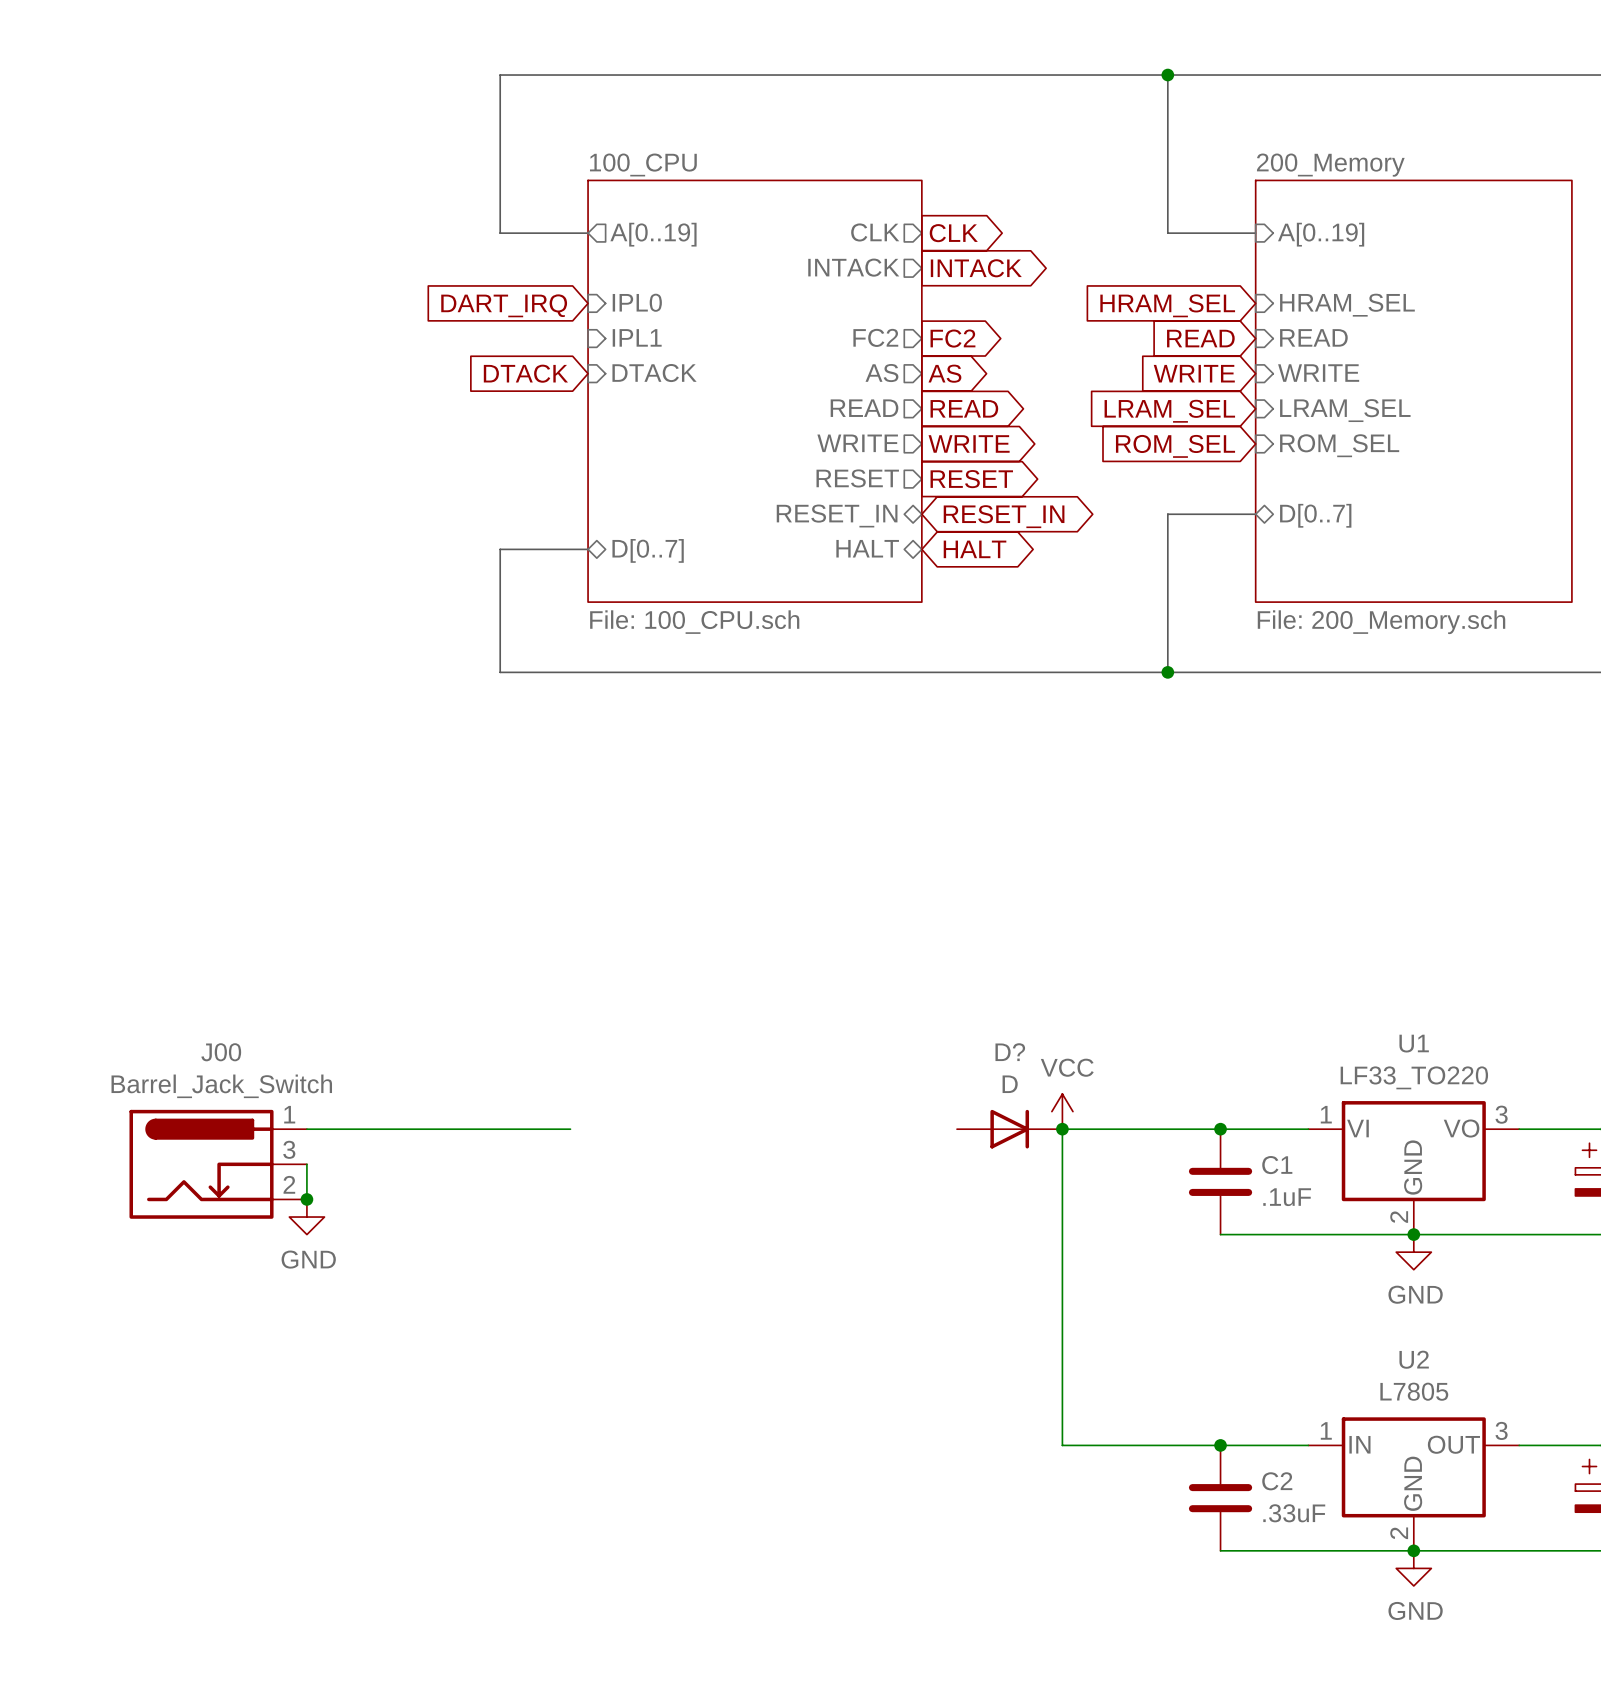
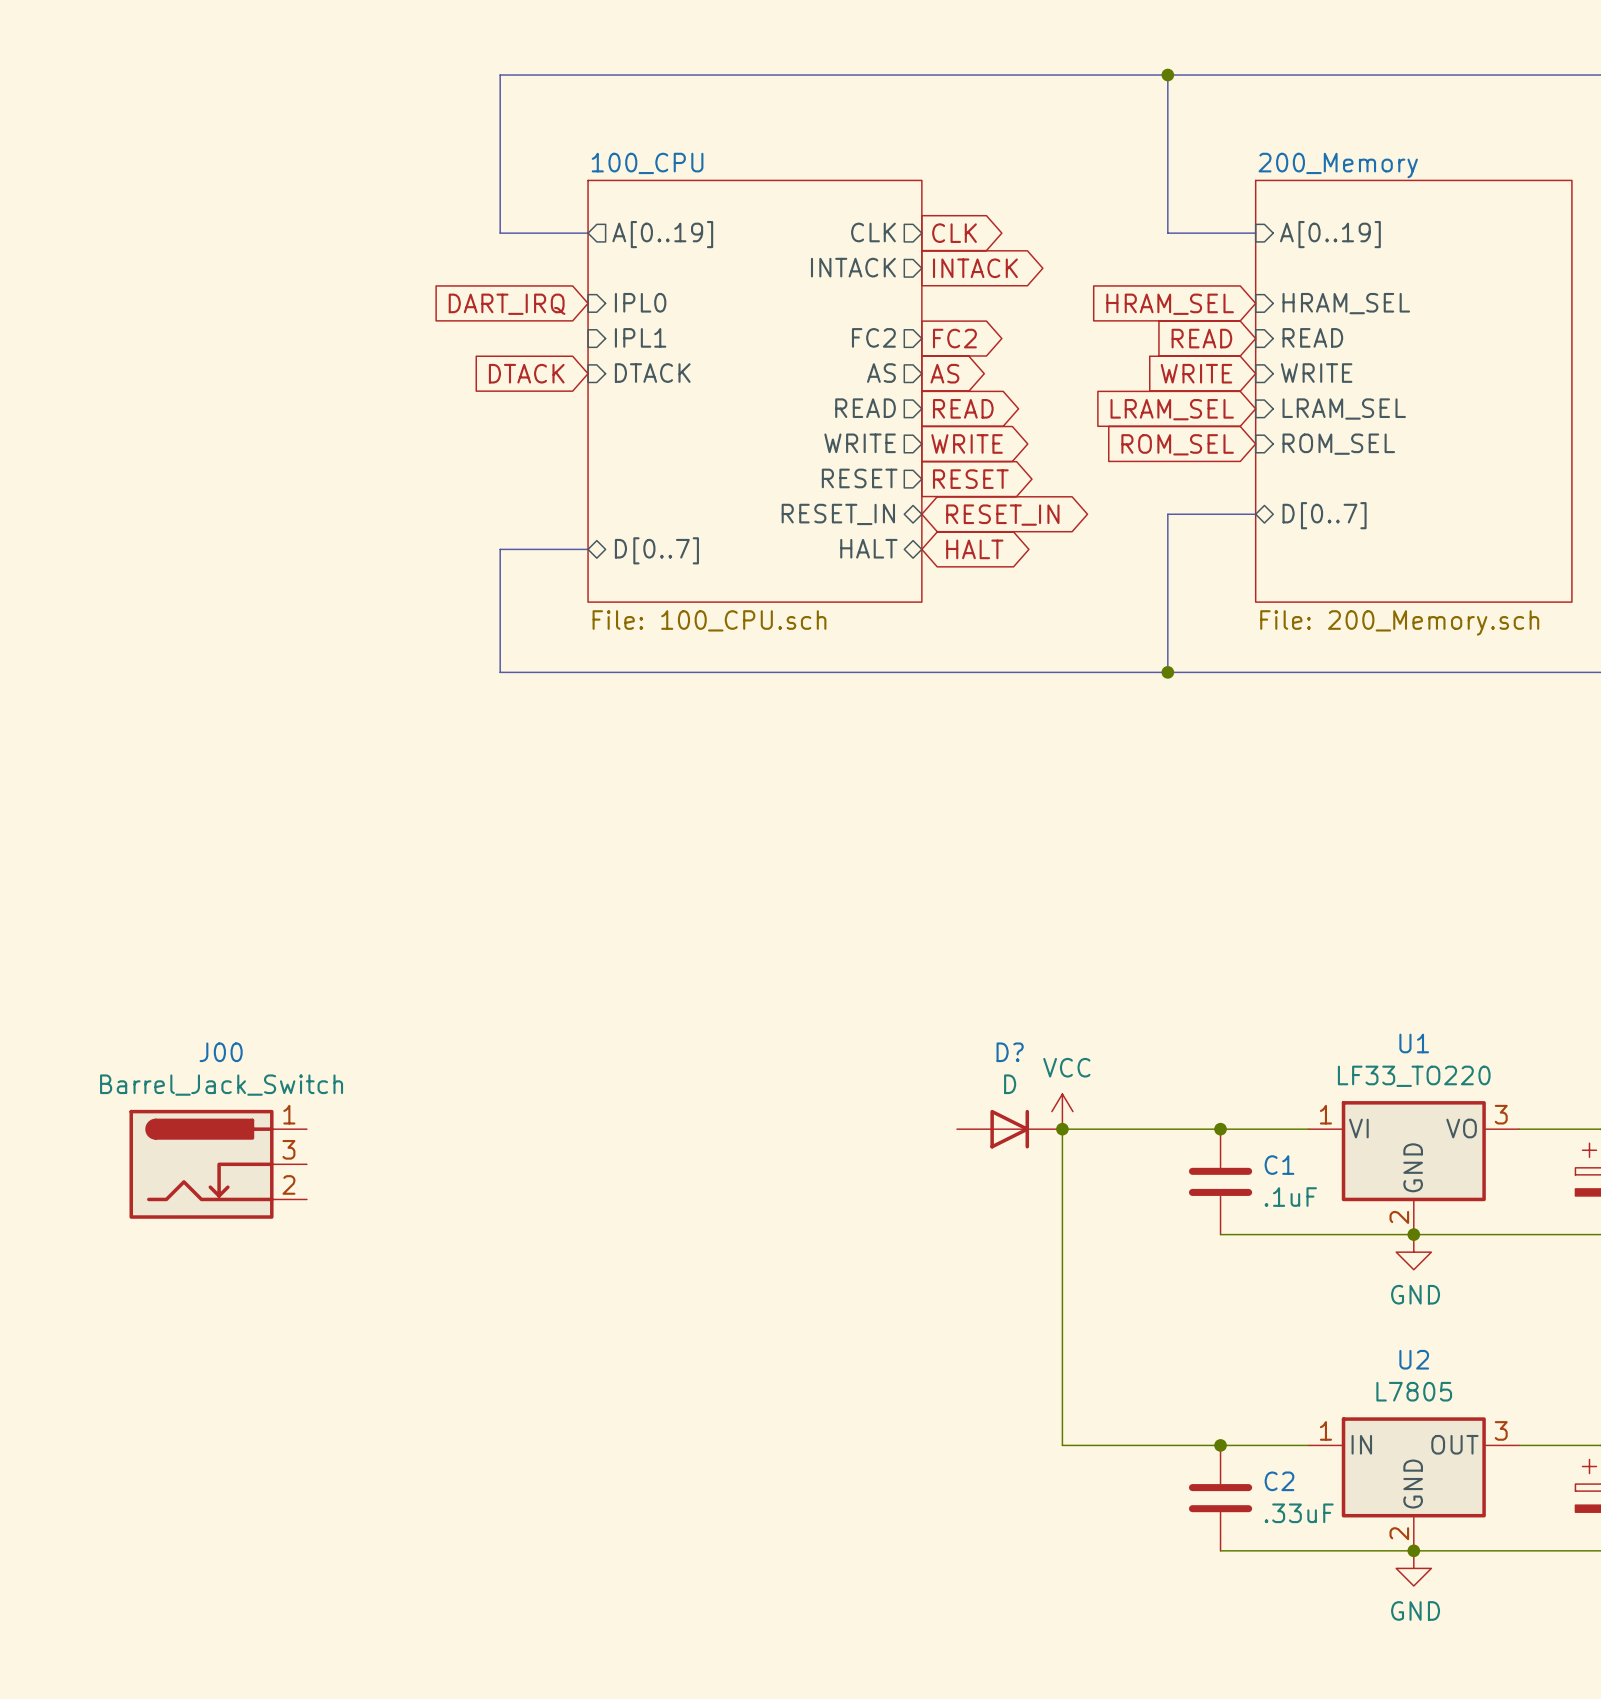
wire: (306, 1129) (570, 1129) -> none
wire: (306, 1164) (306, 1199) -> none
junction: (306, 1199) -> none
power symbol: GND (306, 1217) -> none

